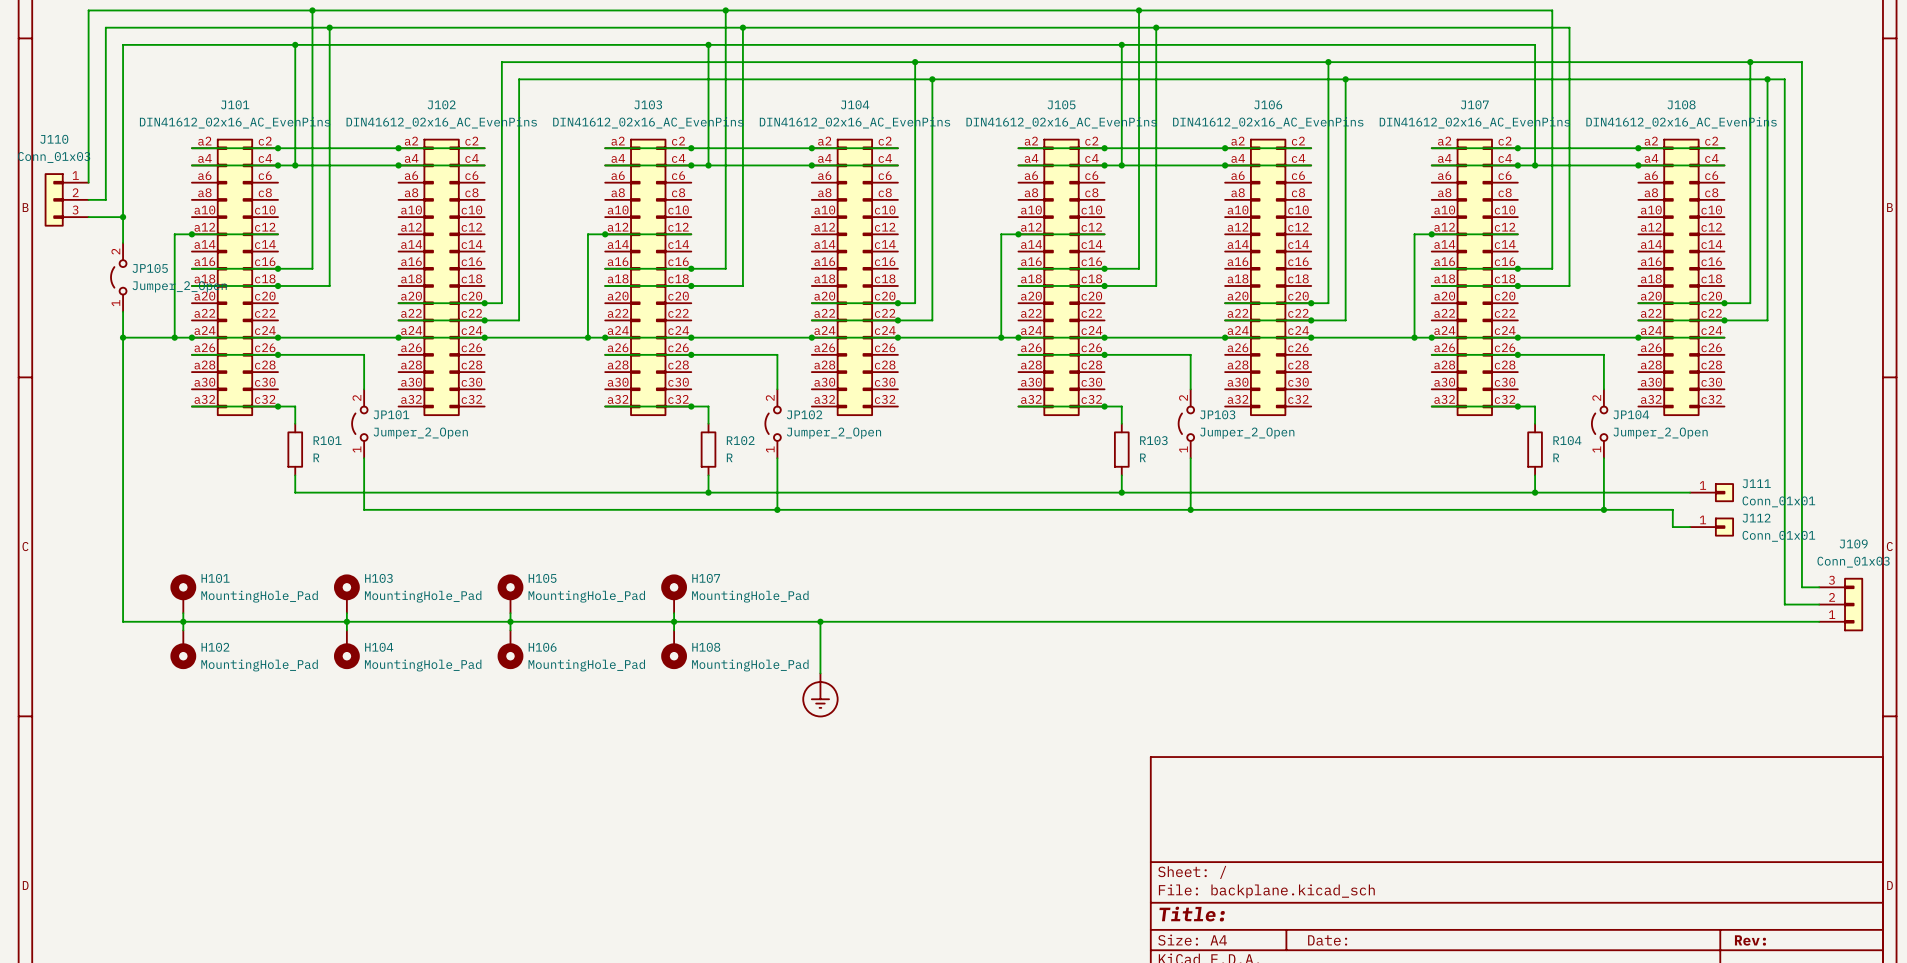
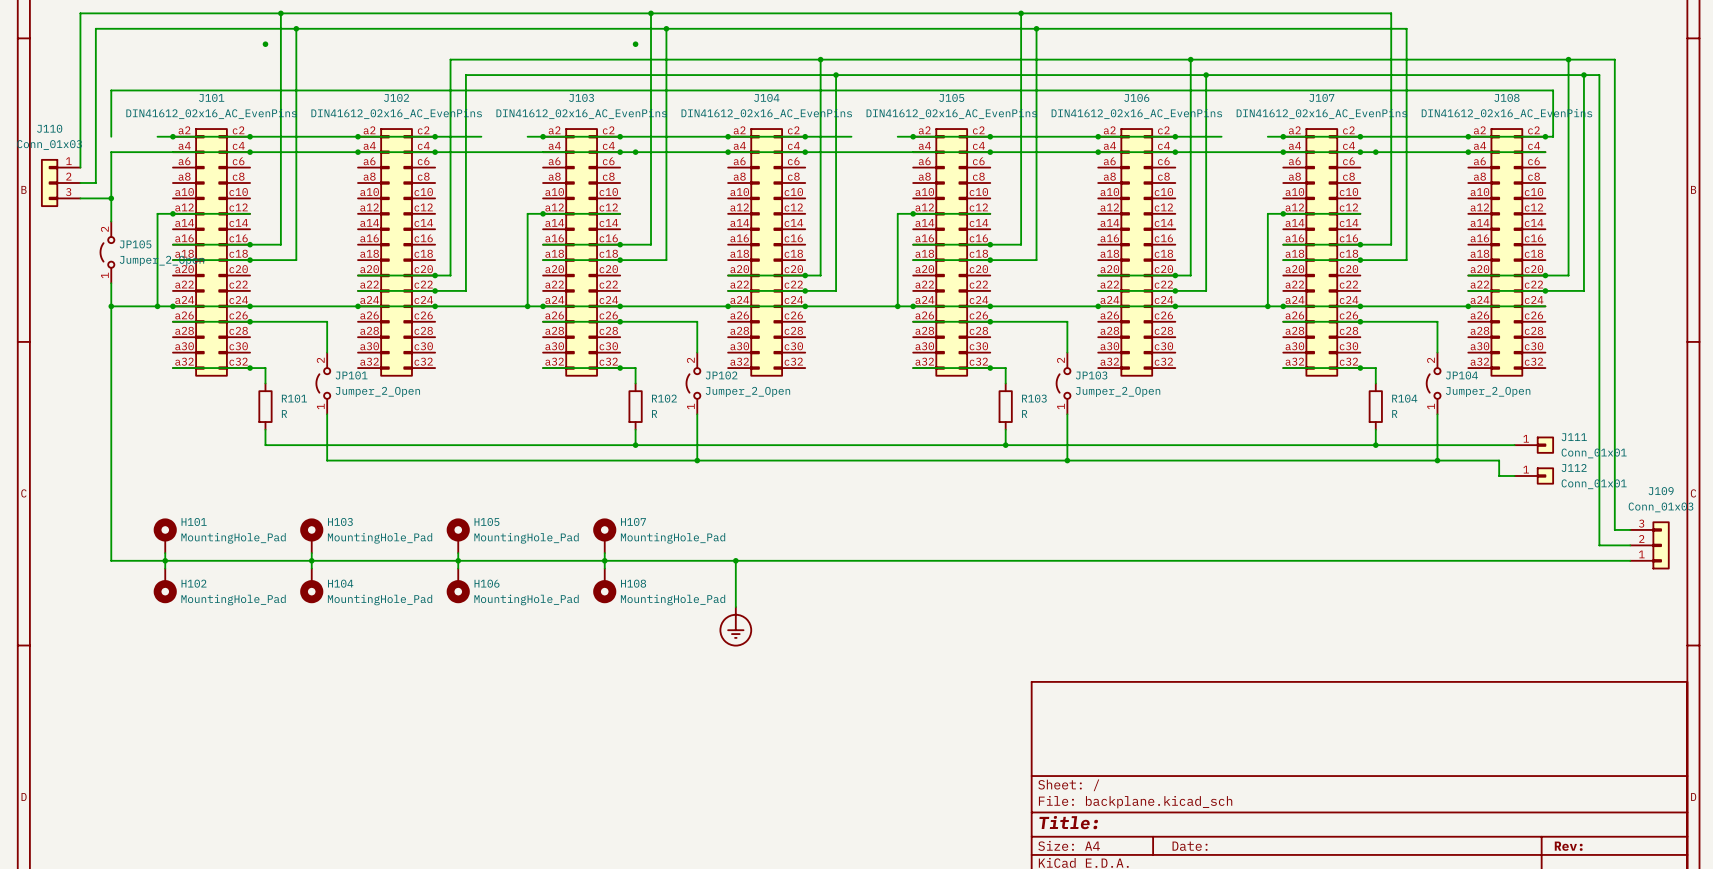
wire: (295, 44) (295, 165) -> none
wire: (708, 44) (708, 165) -> none
wire: (1121, 44) (1121, 165) -> none
junction: (1121, 44) -> none
wire: (123, 96) (123, 44) (1535, 44) (1535, 165) -> (111, 90) (1553, 90) (1553, 136) (1545, 136)
wire: (123, 148) (123, 165) -> (172, 152) (111, 152)
wire: none -> (157, 136) (172, 136)
junction: none -> (172, 136)
wire: none -> (435, 136) (481, 136)
junction: none -> (435, 136)
wire: none -> (527, 136) (543, 136)
junction: none -> (543, 136)
wire: none -> (805, 136) (851, 136)
junction: none -> (805, 136)
wire: none -> (897, 136) (913, 136)
junction: none -> (913, 136)
wire: none -> (1175, 136) (1221, 136)
junction: none -> (1175, 136)
wire: none -> (1267, 136) (1283, 136)
junction: none -> (1283, 136)
junction: none -> (1545, 136)
junction: (295, 165) -> none
wire: none -> (435, 152) (543, 152)
junction: none -> (435, 152)
wire: none -> (805, 152) (913, 152)
junction: none -> (805, 152)
junction: (1121, 165) -> none
wire: none -> (1175, 152) (1283, 152)
junction: none -> (1175, 152)
junction: none -> (1283, 152)

